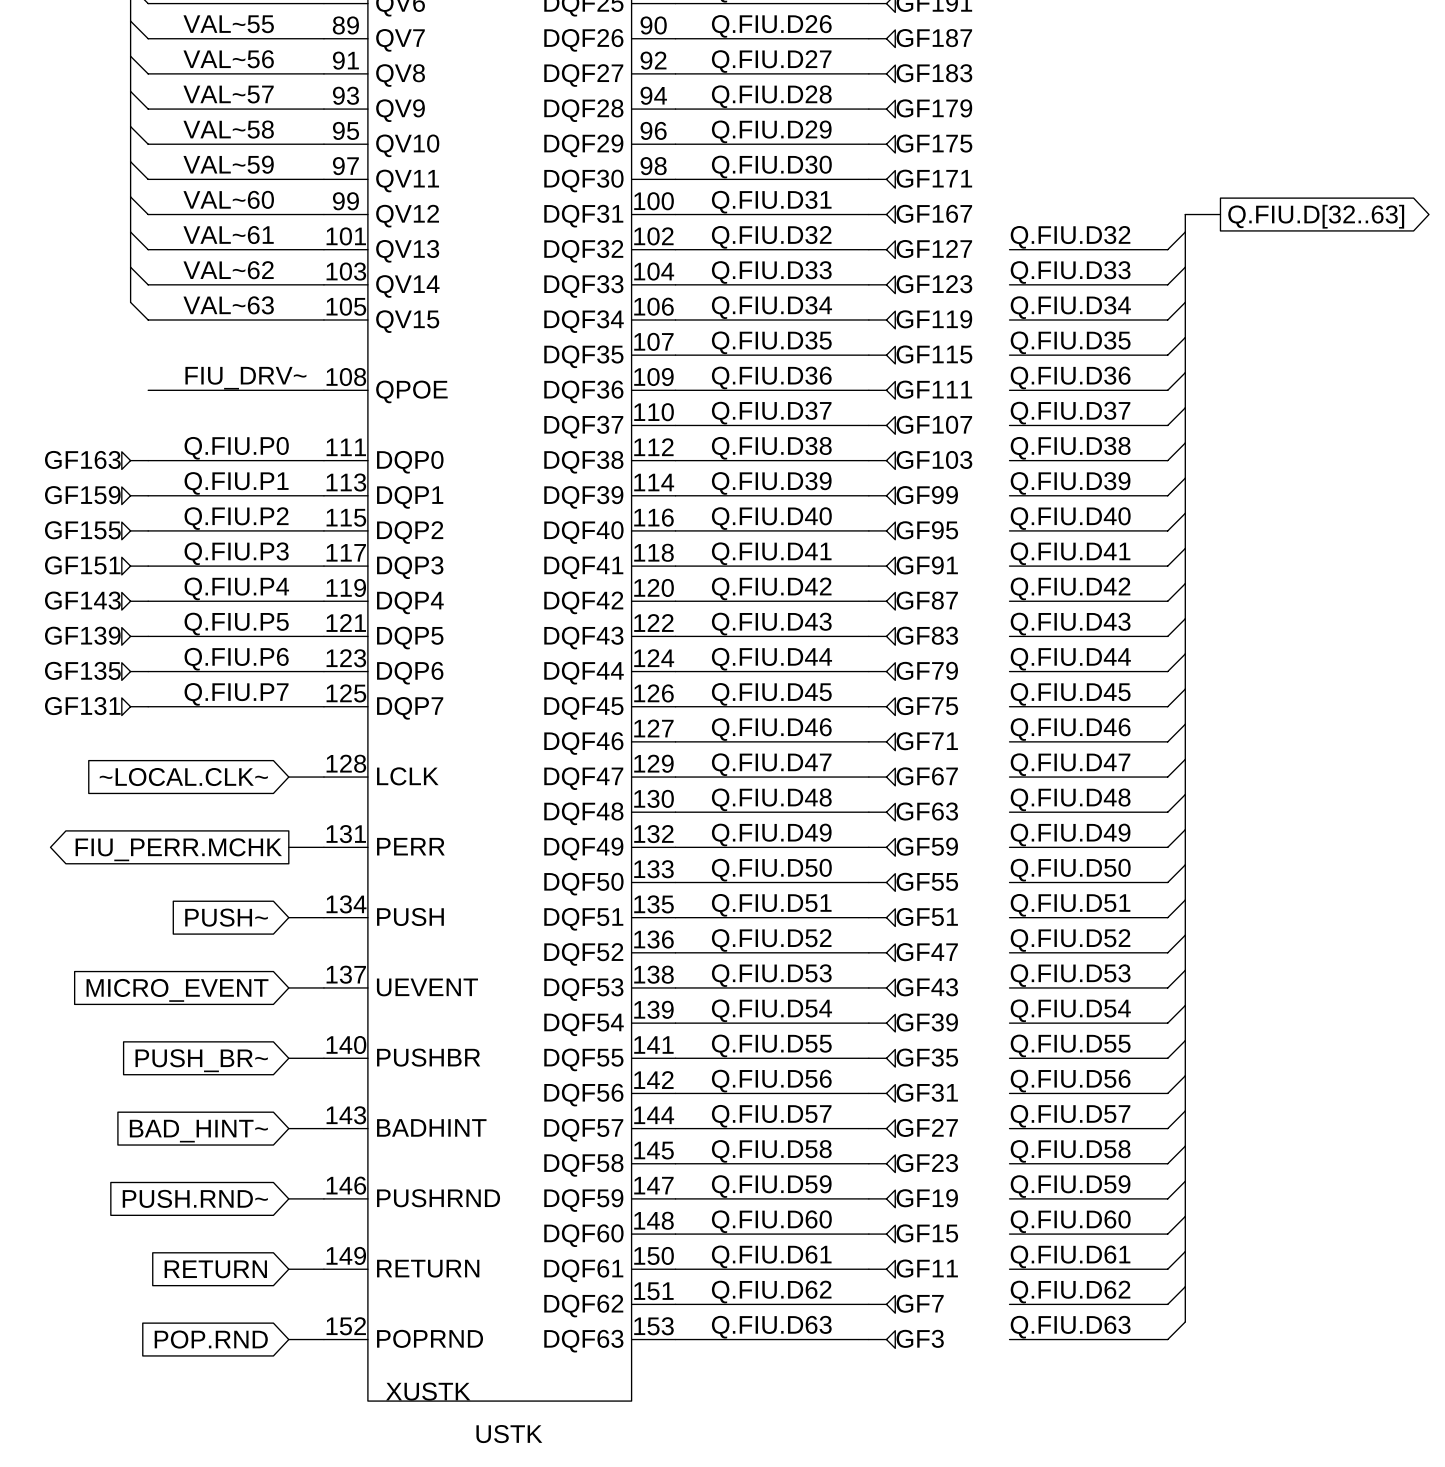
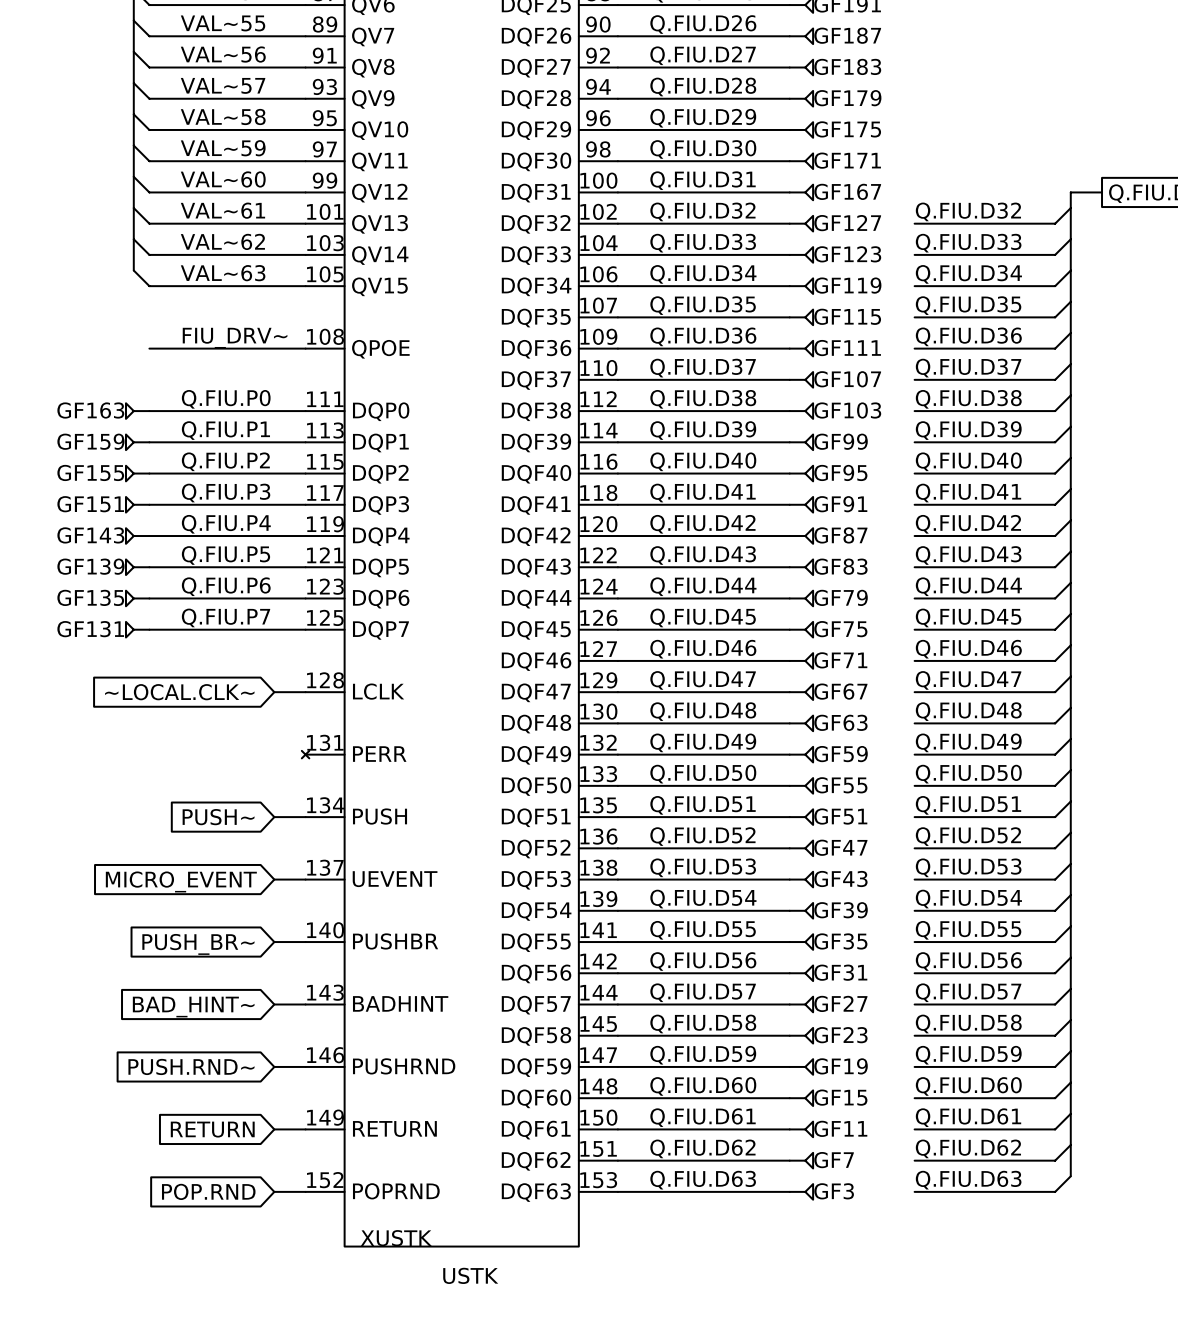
wire: (288, 847) (323, 847) -> none
no-connect mark: none -> (305, 754)
global label: FIU_PERR.MCHK (178, 849) -> none

